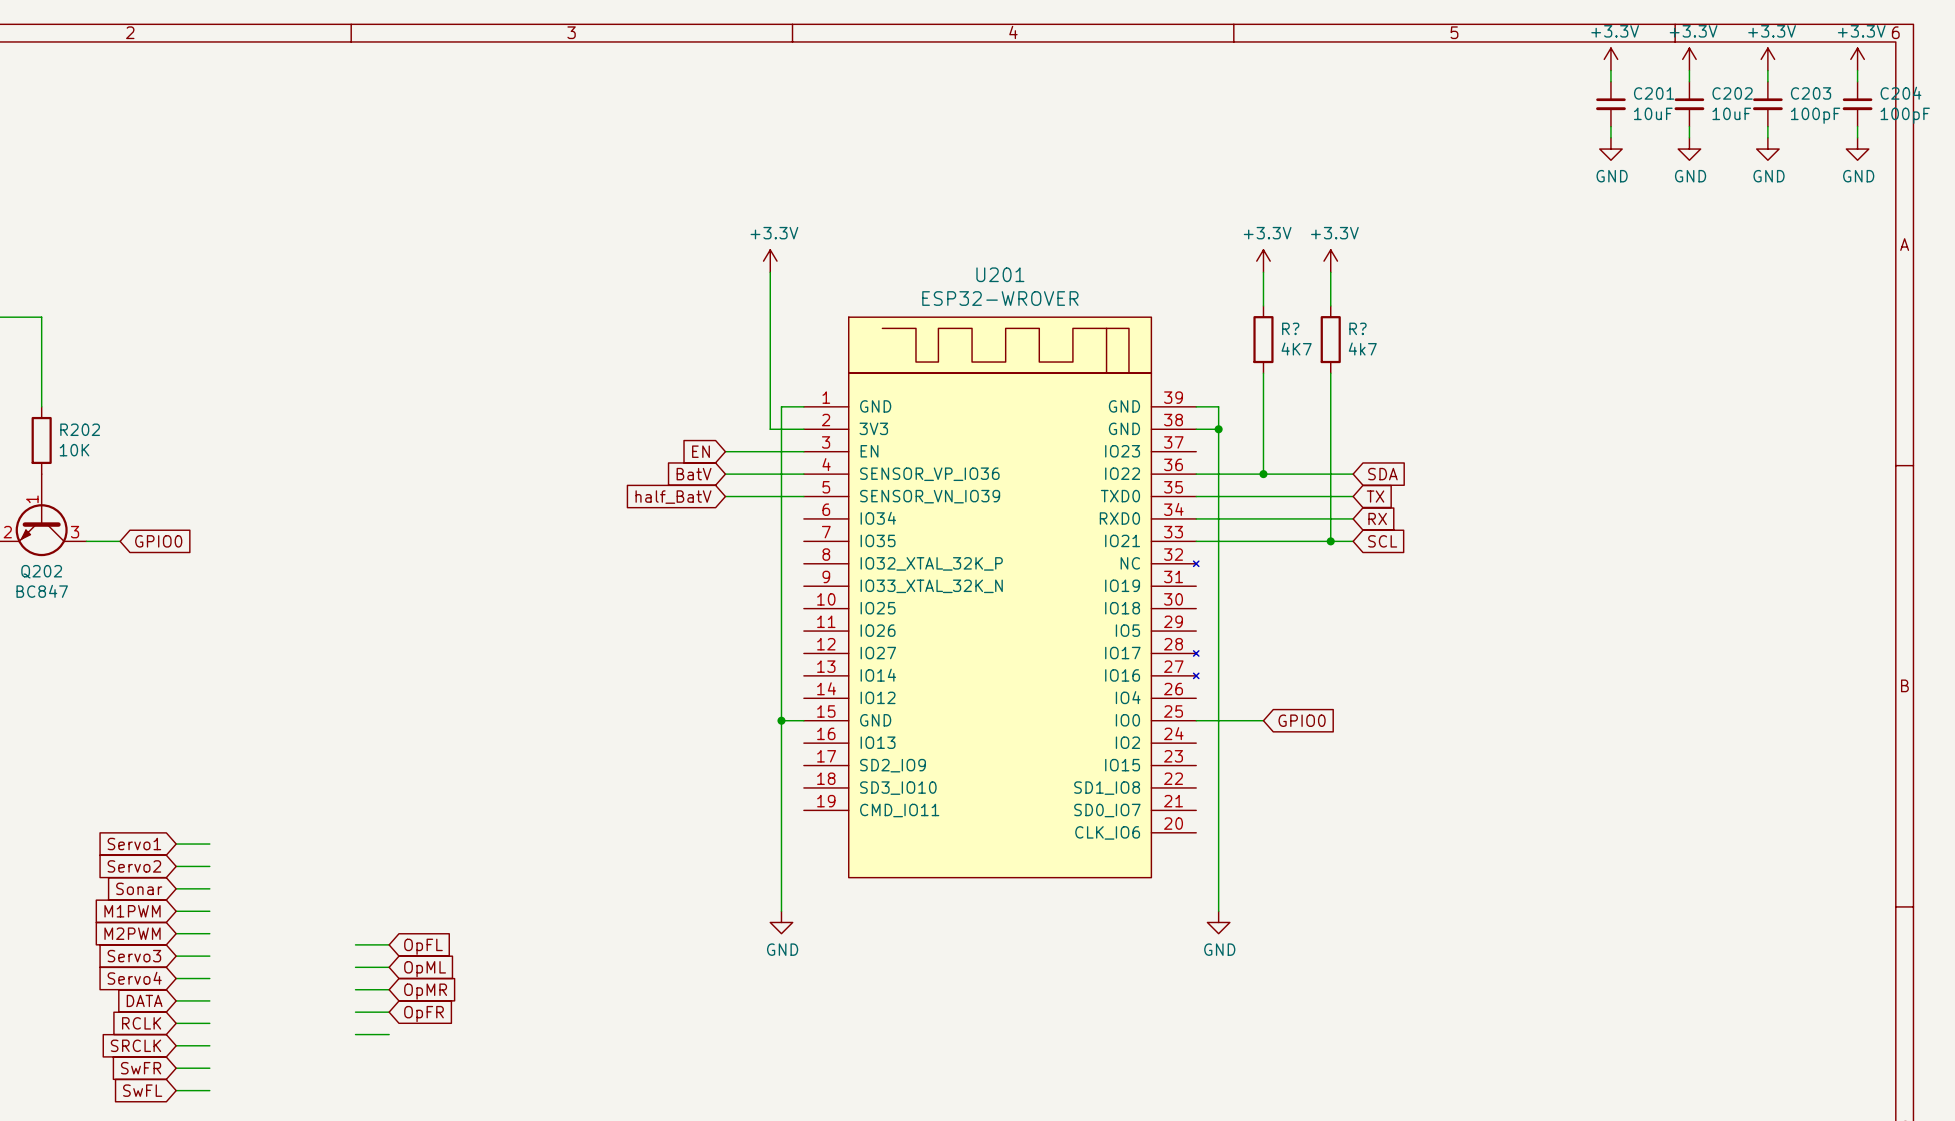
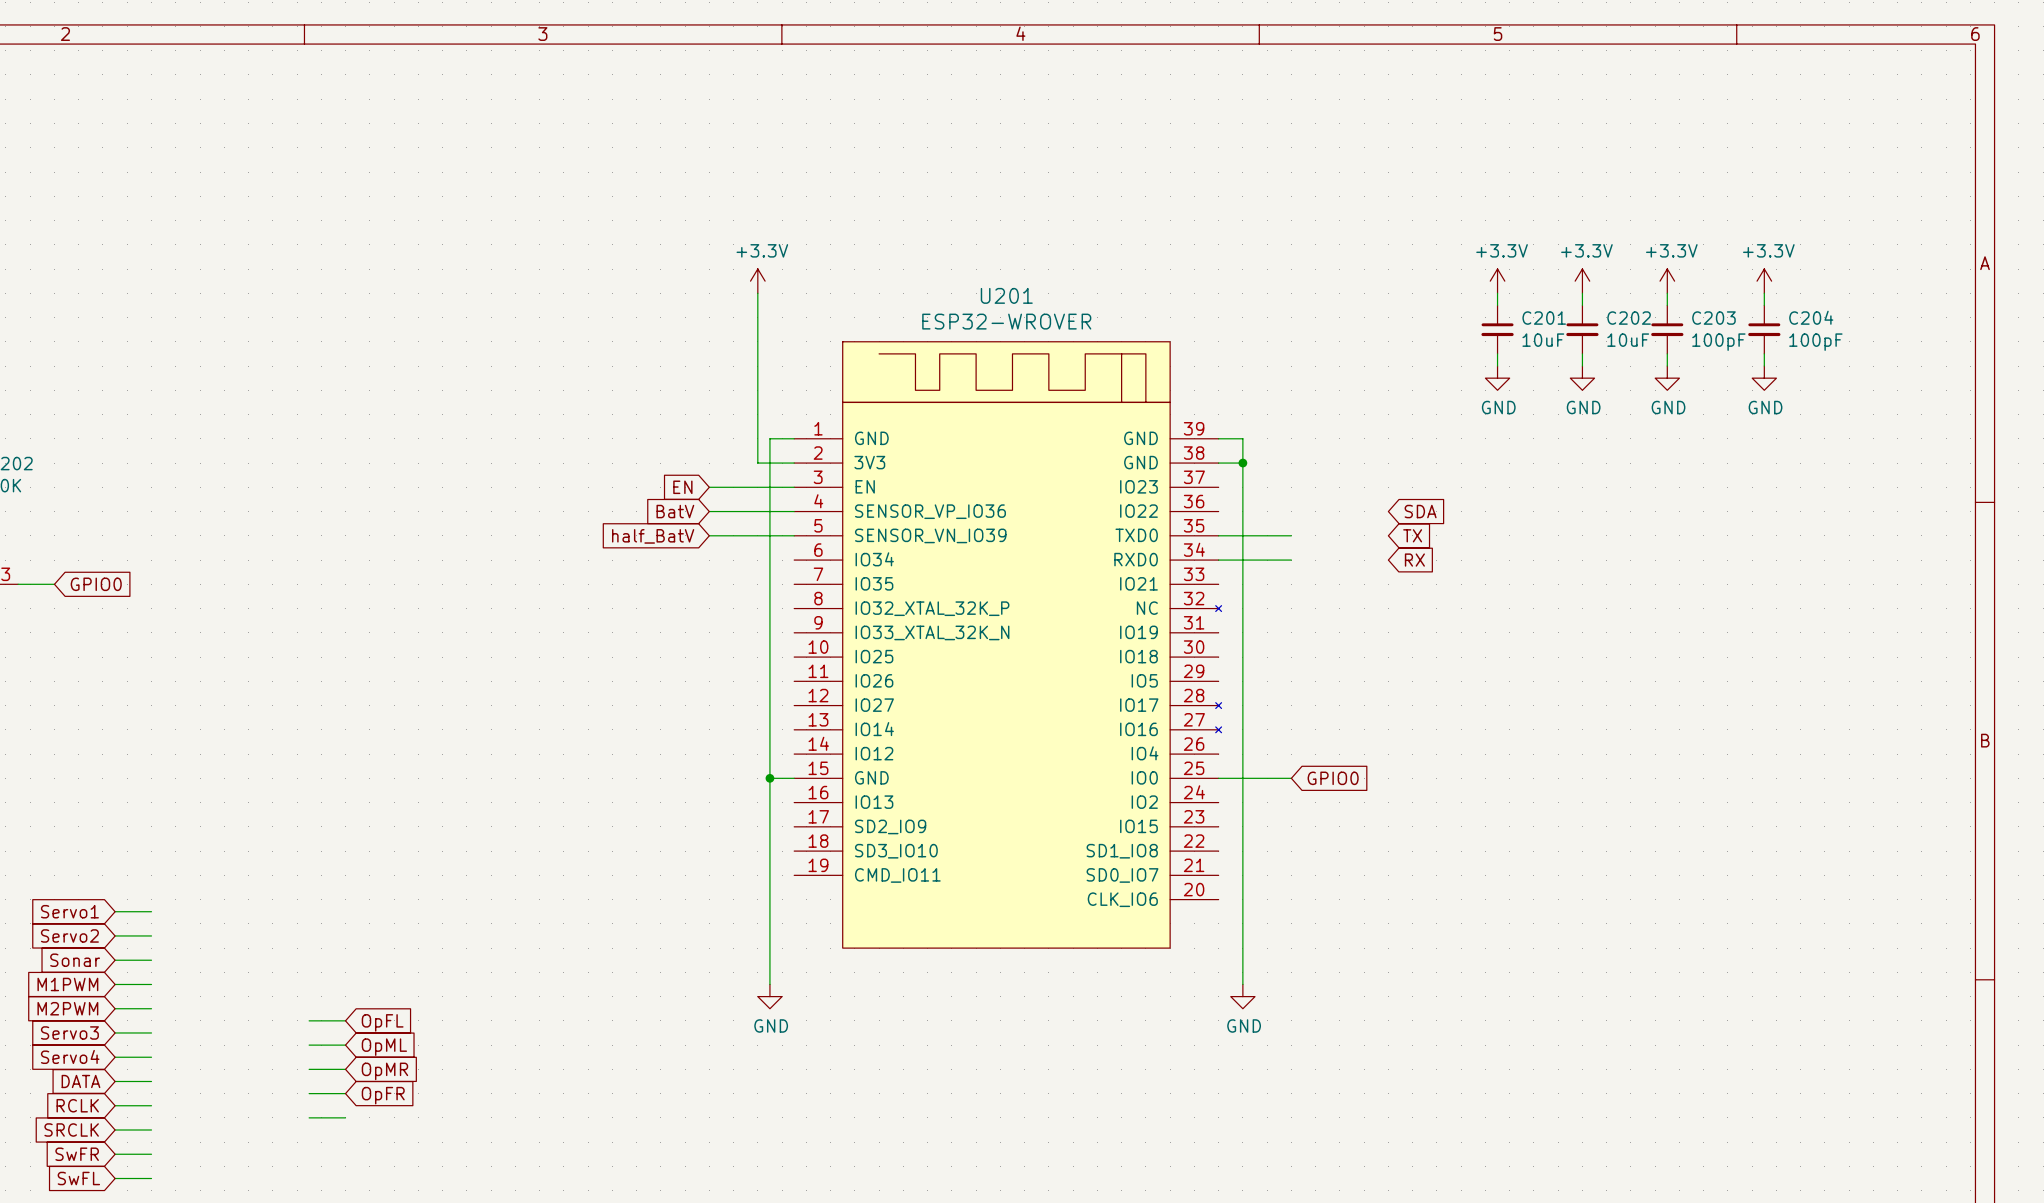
power symbol: +3.3V (1610, 59) -> none
power symbol: +3.3V (1689, 59) -> none
power symbol: +3.3V (1767, 59) -> none
power symbol: +3.3V (1857, 59) -> none
wire: (1610, 70) (1610, 81) -> none
wire: (1689, 70) (1689, 81) -> none
wire: (1767, 70) (1767, 81) -> none
wire: (1857, 70) (1857, 81) -> none
C201 position: (1610, 104) -> (1497, 329)
C202 position: (1689, 104) -> (1582, 329)
C203 position: (1767, 104) -> (1667, 329)
C204 position: (1857, 104) -> (1764, 329)
wire: (1610, 126) (1610, 137) -> (1497, 293) (1497, 305)
wire: (1689, 126) (1689, 137) -> (1582, 293) (1582, 305)
wire: (1767, 126) (1767, 137) -> (1667, 293) (1667, 305)
wire: (1857, 126) (1857, 137) -> (1764, 293) (1764, 305)
power symbol: GND (1610, 149) -> none
power symbol: GND (1689, 149) -> none
power symbol: GND (1767, 149) -> none
power symbol: GND (1857, 149) -> none
power symbol: +3.3V (1263, 261) -> none
power symbol: +3.3V (1330, 261) -> none
power symbol: none -> +3.3V (1497, 281)
power symbol: none -> +3.3V (1582, 281)
power symbol: none -> +3.3V (1667, 281)
power symbol: none -> +3.3V (1764, 281)
wire: (1263, 272) (1263, 305) -> none
wire: (1330, 272) (1330, 305) -> none
wire: none -> (1497, 353) (1497, 366)
wire: none -> (1582, 353) (1582, 366)
wire: none -> (1667, 353) (1667, 366)
wire: none -> (1764, 353) (1764, 366)
R?: 4K7 (1263, 339) -> none
R?: 4k7 (1330, 339) -> none
power symbol: none -> GND (1497, 378)
power symbol: none -> GND (1582, 378)
power symbol: none -> GND (1667, 378)
power symbol: none -> GND (1764, 378)
wire: (1263, 373) (1263, 474) -> none
wire: (1330, 373) (1330, 541) -> none
wire: (1196, 474) (1353, 474) -> none
junction: (1263, 474) -> none
wire: (1263, 496) (1353, 496) -> none
wire: (1263, 518) (1353, 518) -> none
wire: (1196, 541) (1353, 541) -> none
junction: (1330, 541) -> none
global label: SCL (1382, 541) -> none

